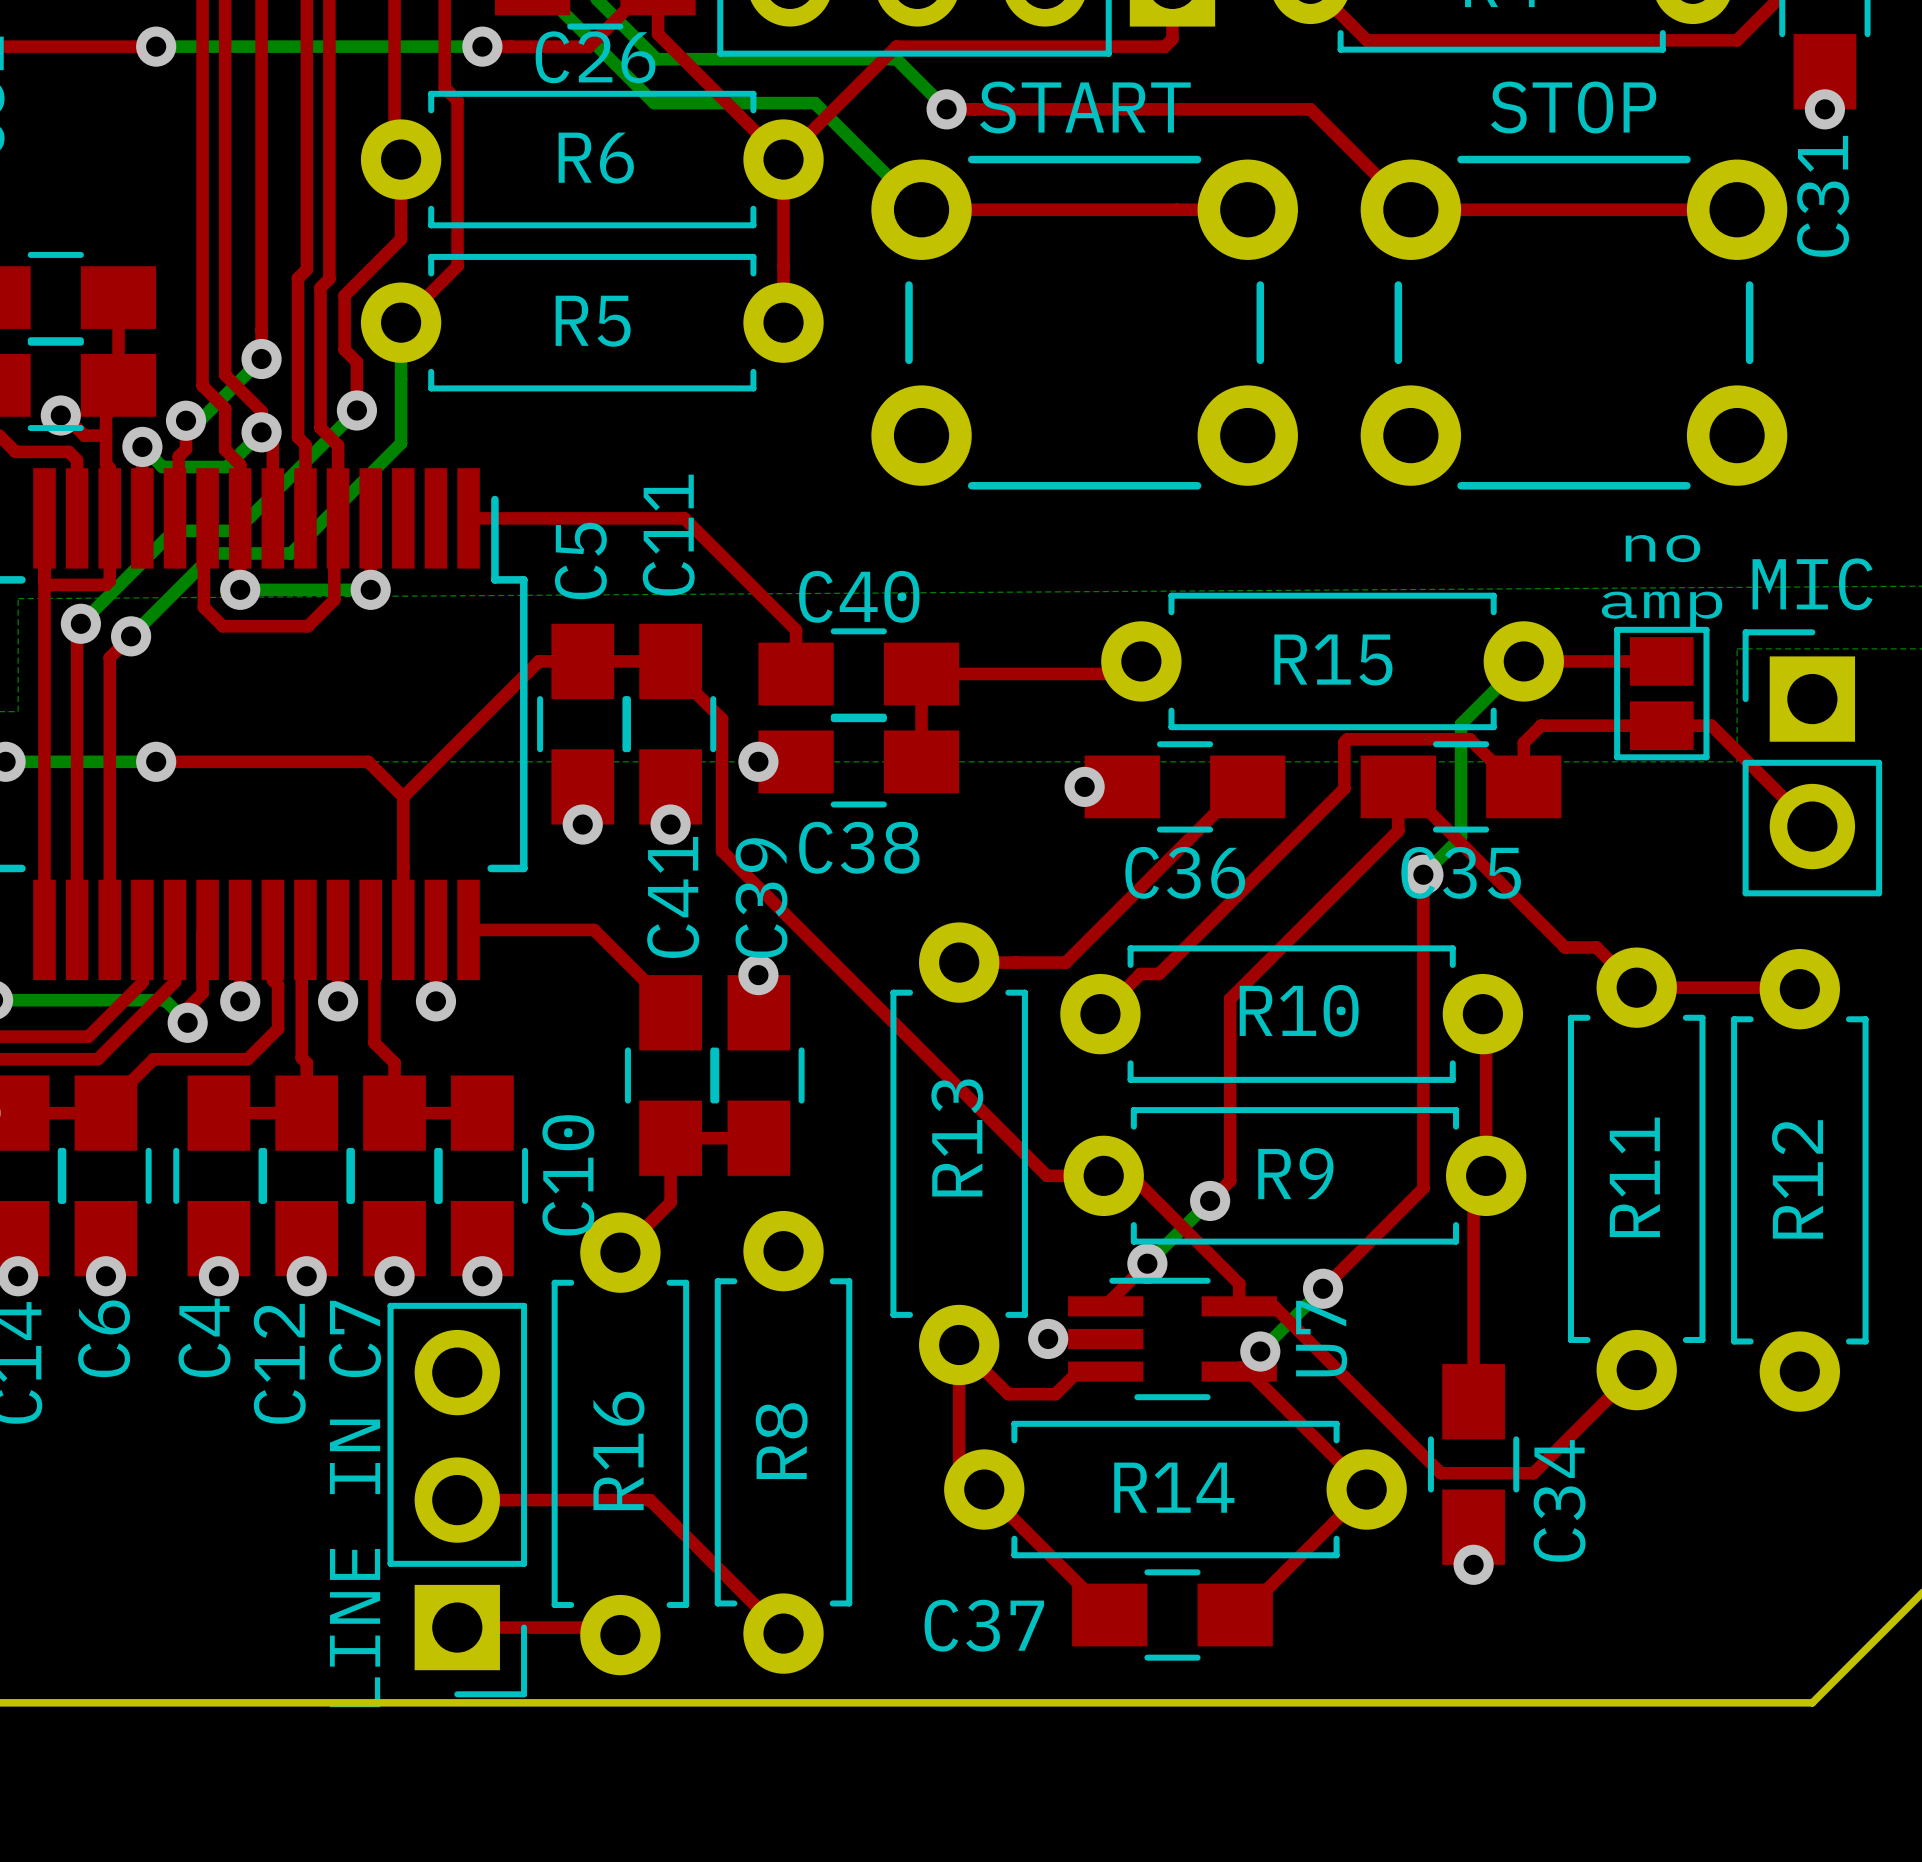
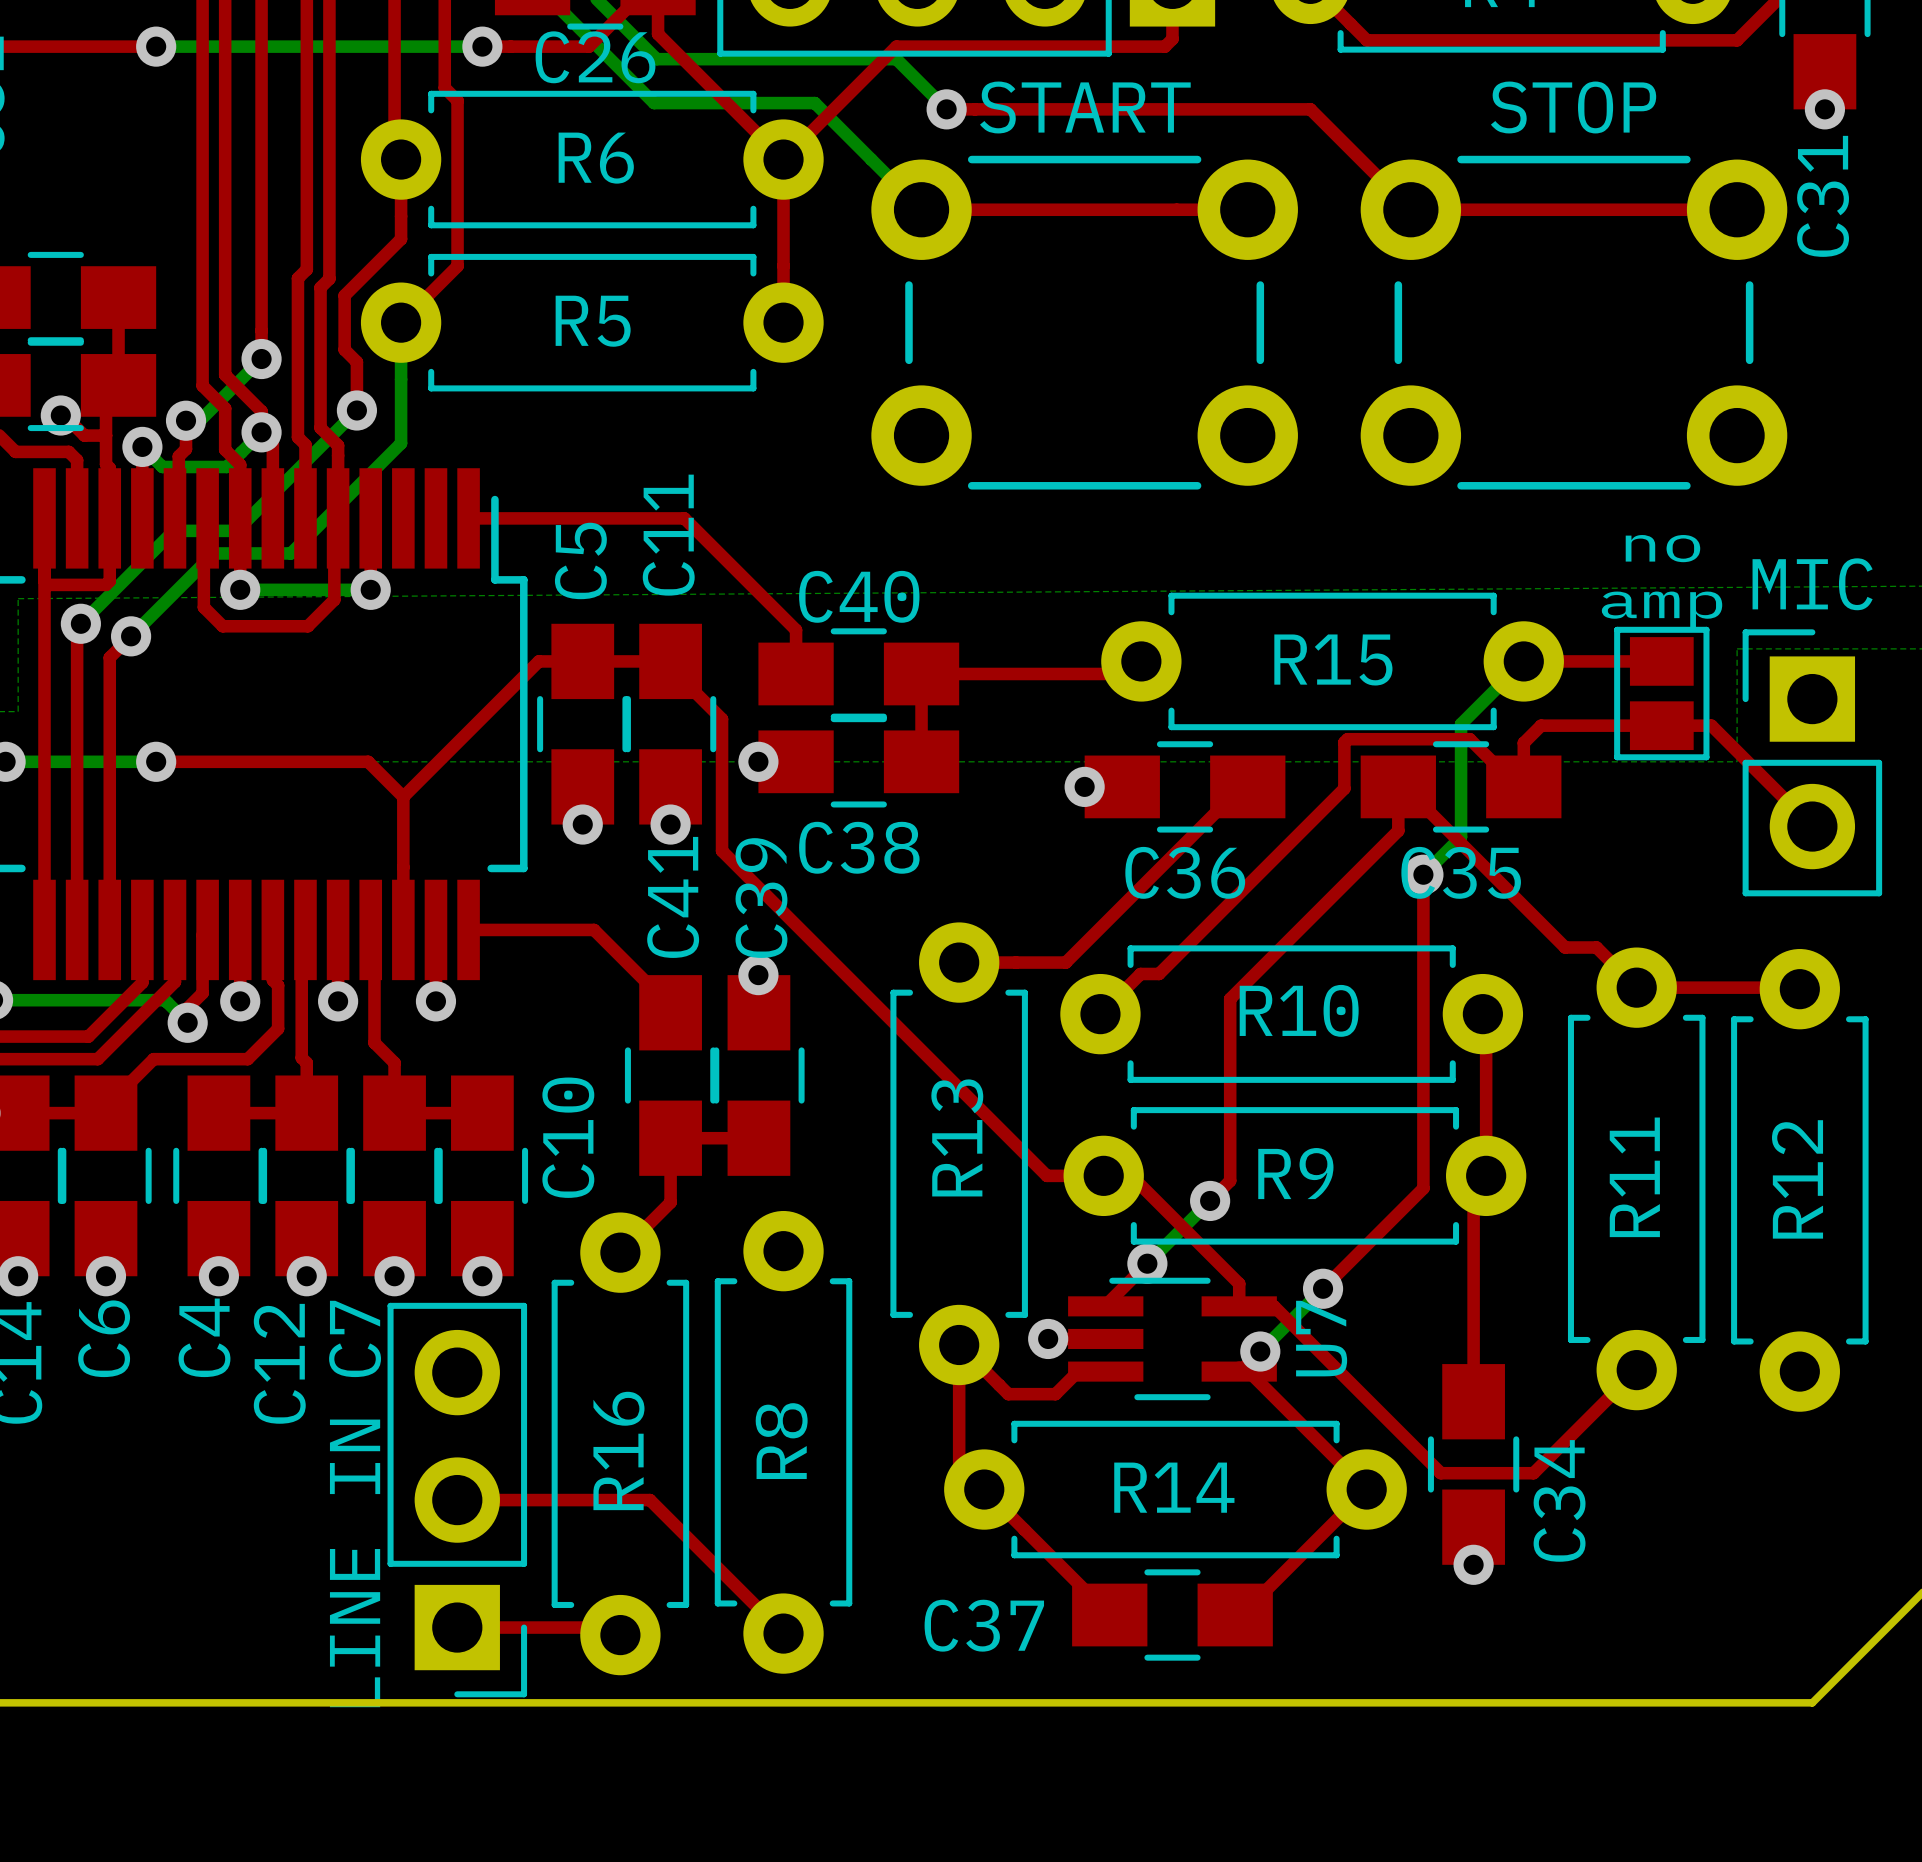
C10 name position: C10 (568, 1175) -> C10 (568, 1137)

